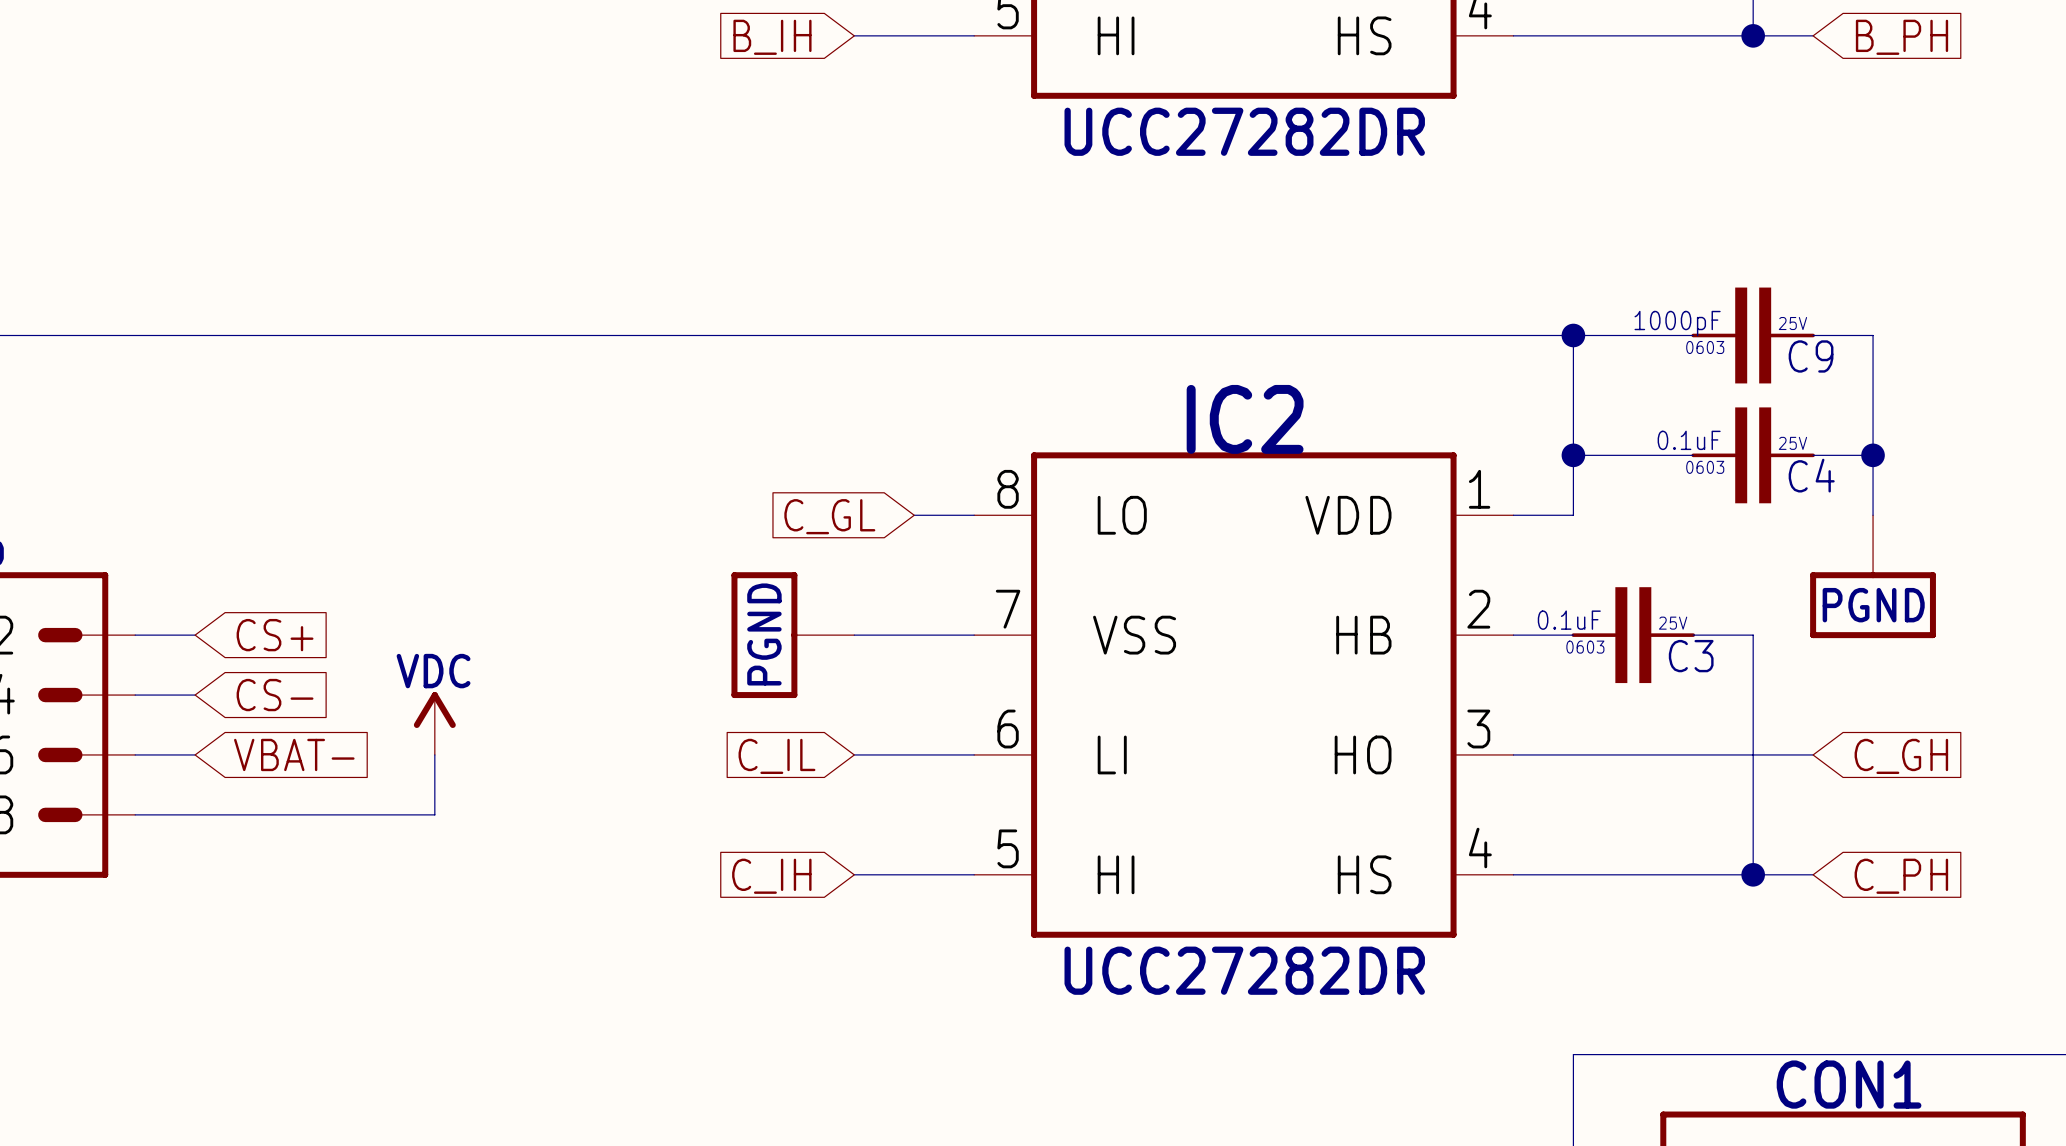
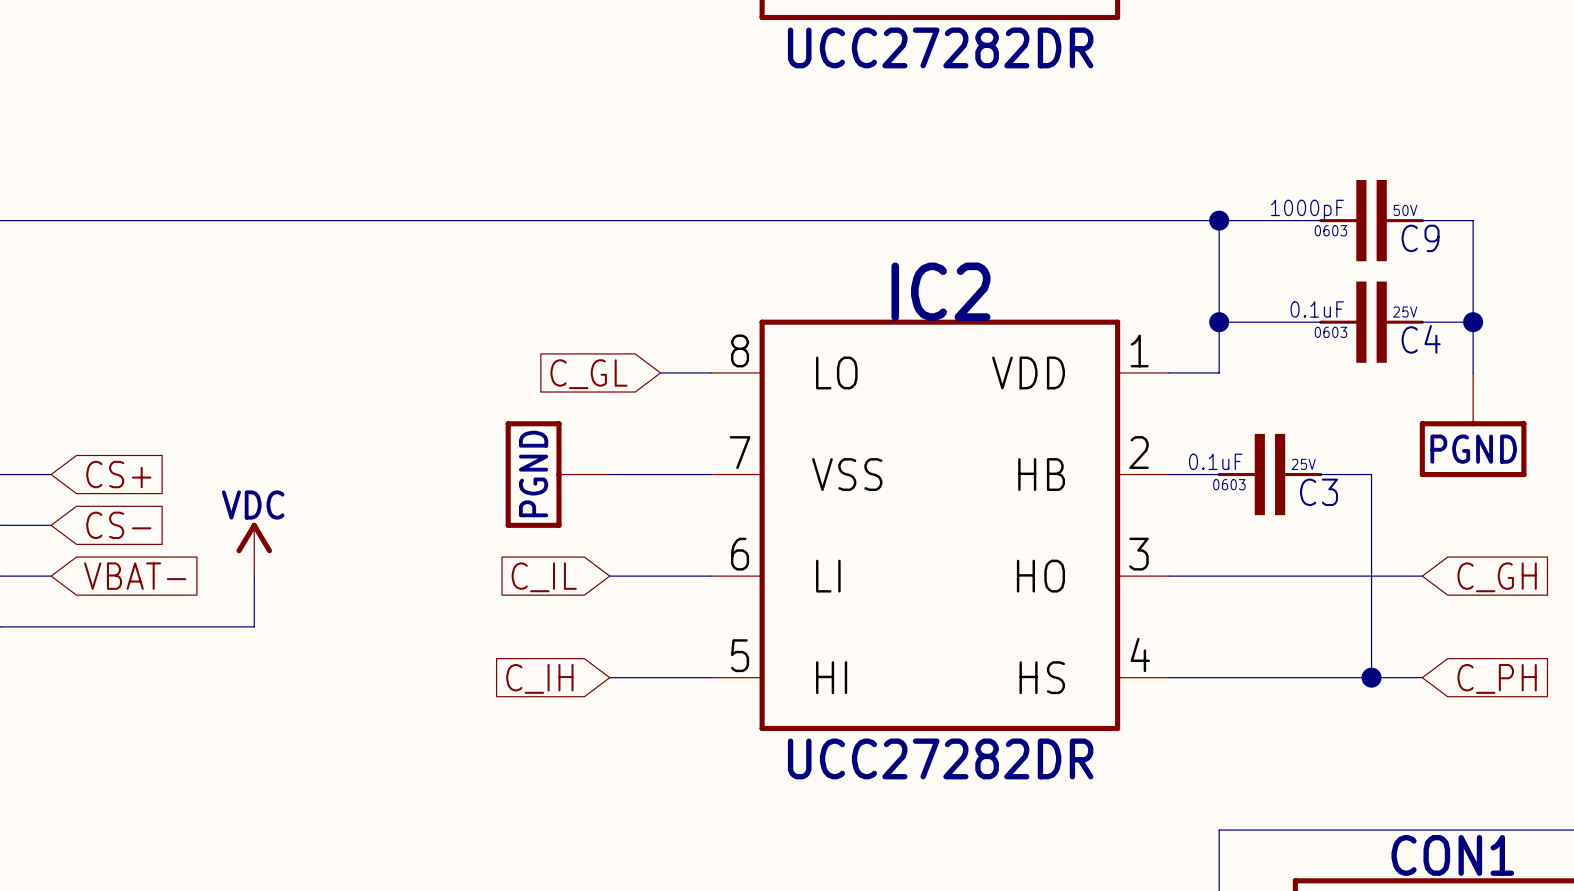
C9 text: 25V (1792, 323) -> 50V (1405, 210)

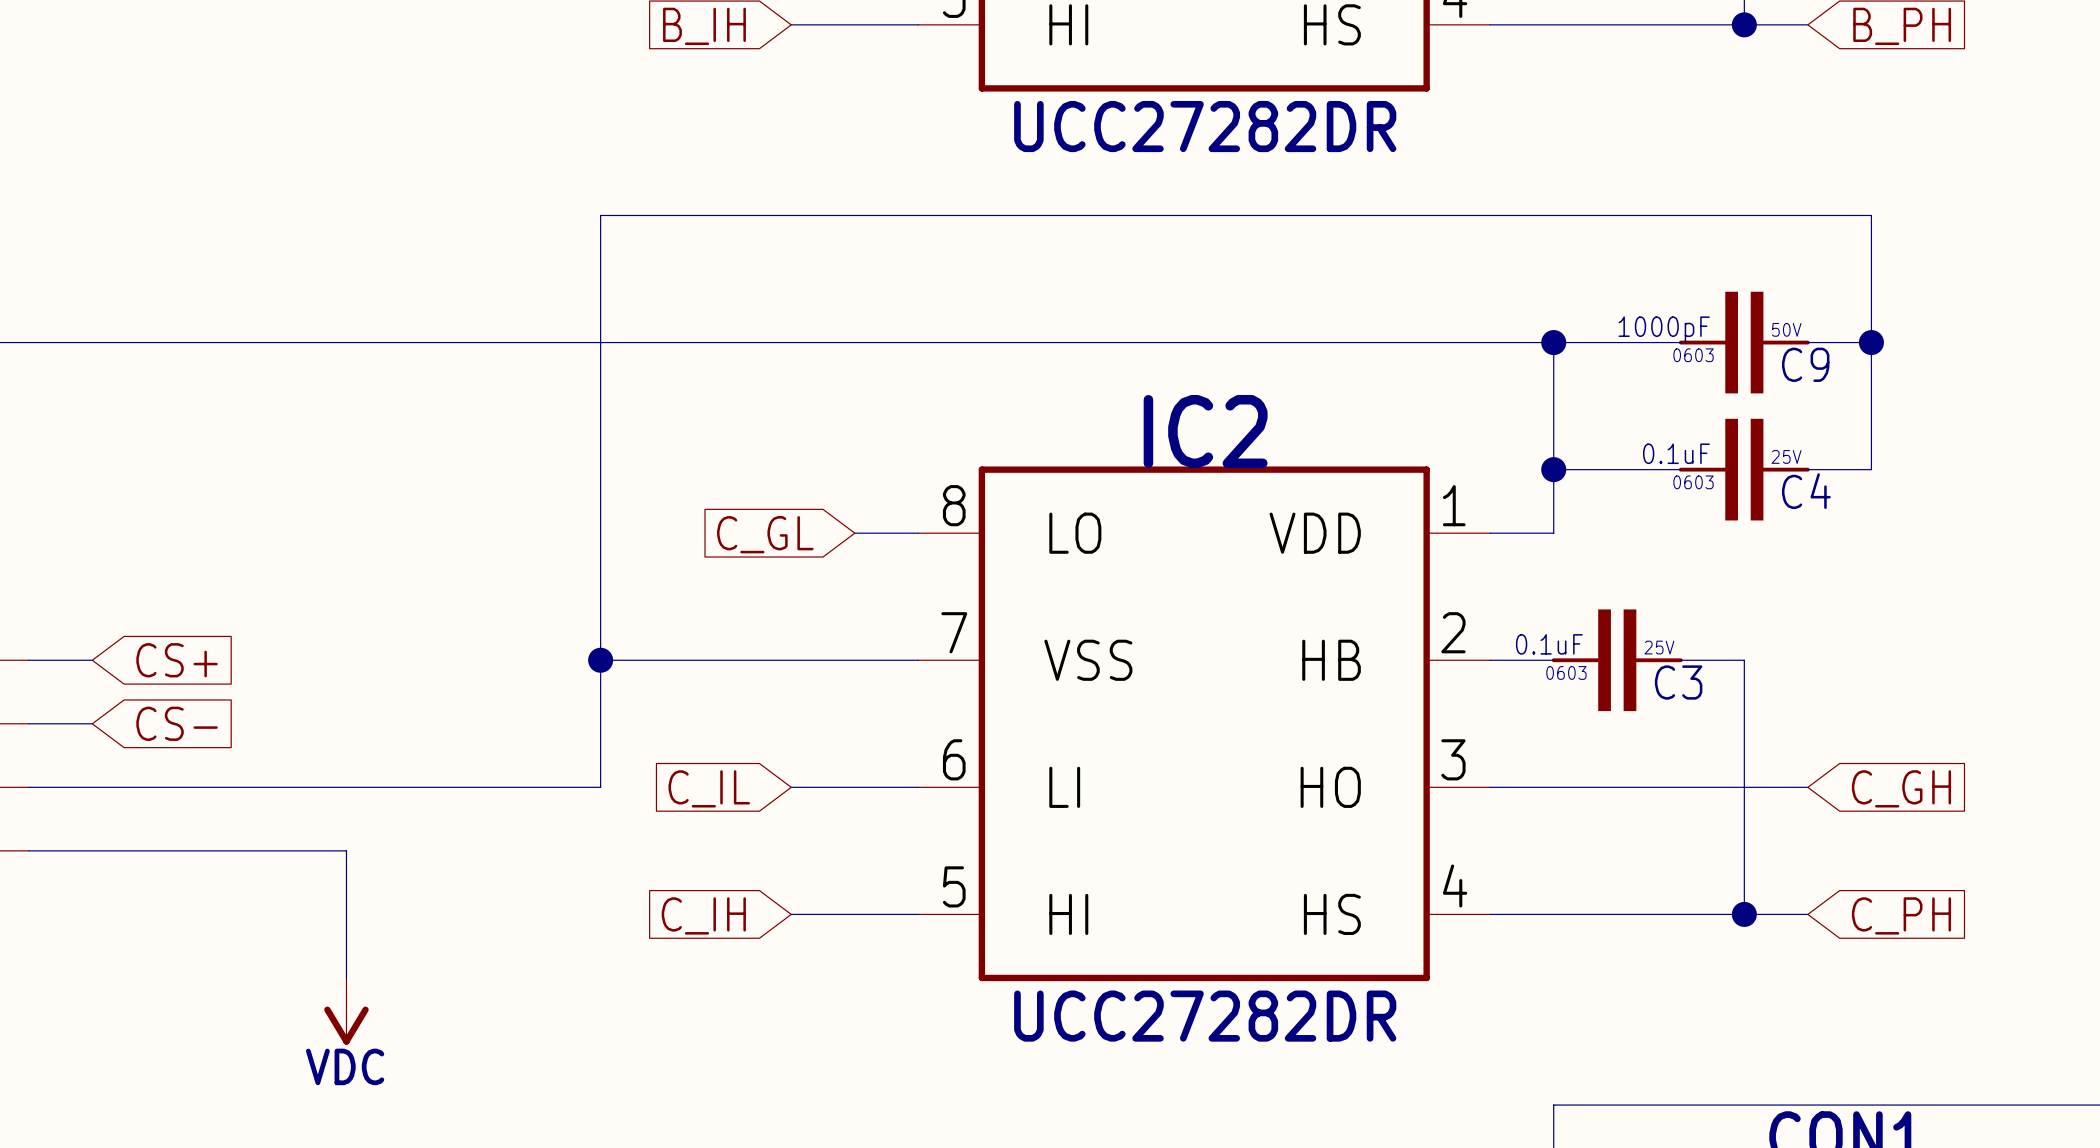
wire: none -> (1871, 342) (1871, 215) (600, 215) (600, 787) (92, 787)
wire: (1473, 322) (1473, 372) -> none
junction position: (1473, 322) -> (1871, 342)
power symbol: PGND (1473, 425) -> none
wire: none -> (600, 660) (791, 660)
junction: none -> (600, 660)
power symbol: PGND (557, 474) -> none
power symbol rotation: 0° (254, 538) -> 180° (346, 1025)
power symbol position: VDC (254, 549) -> VDC (346, 1011)
global label: VBAT- (135, 576) -> none
wire: (254, 576) (254, 626) -> (346, 977) (346, 850)

